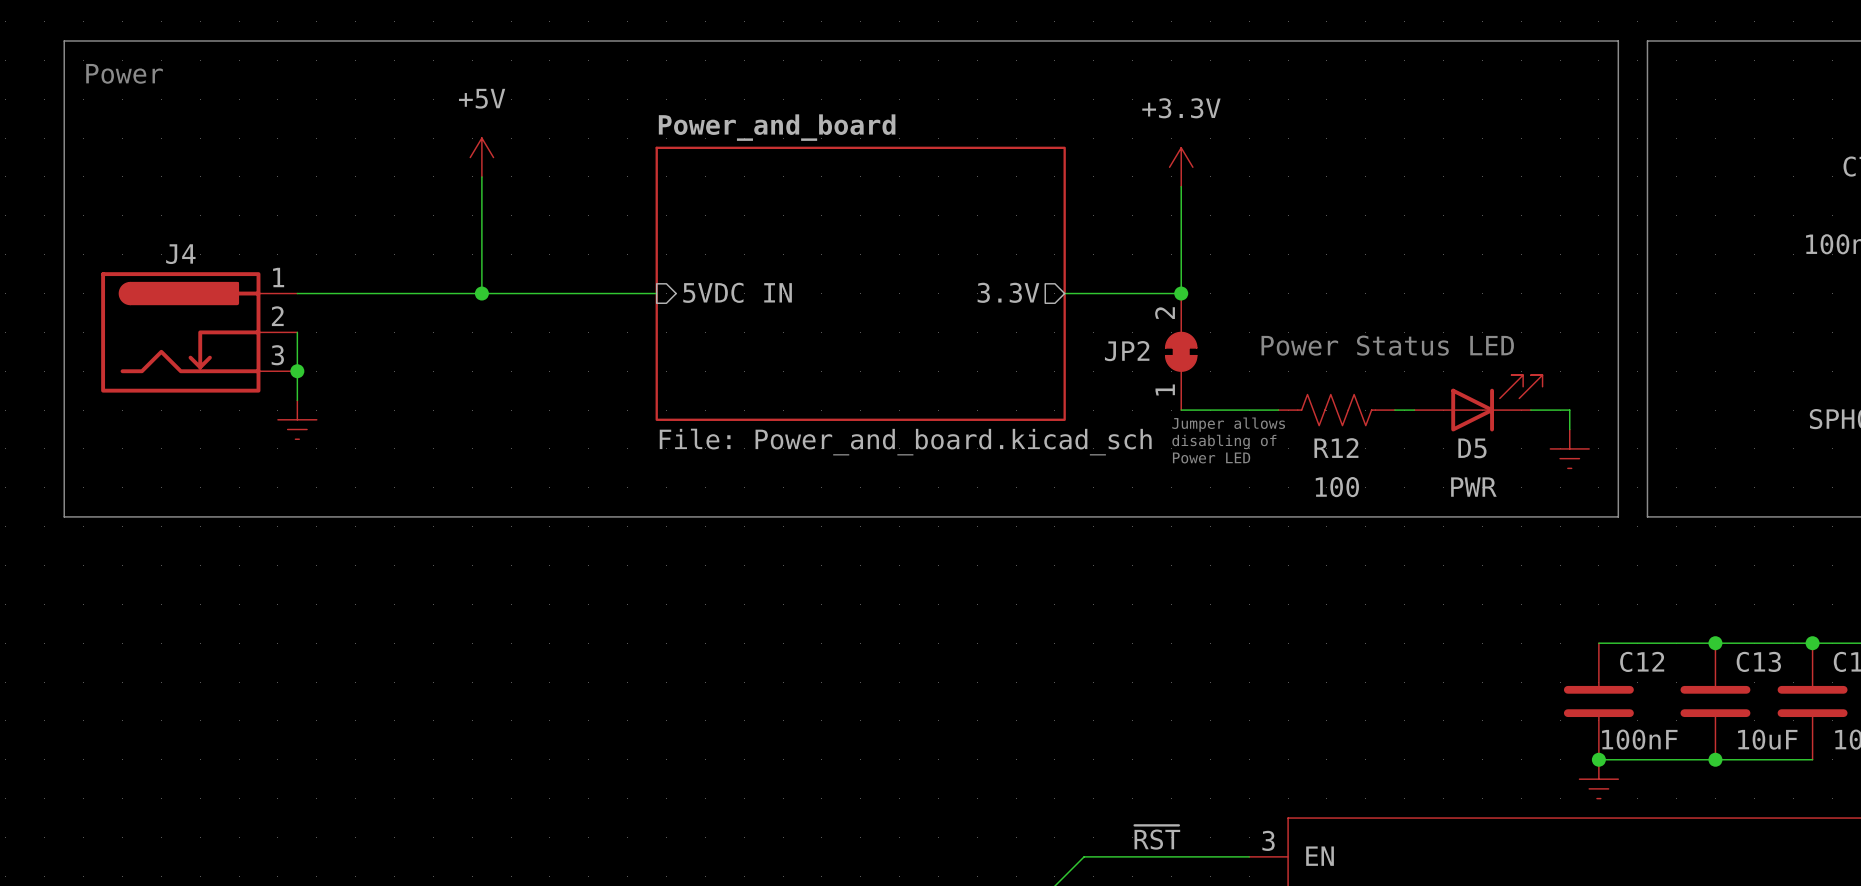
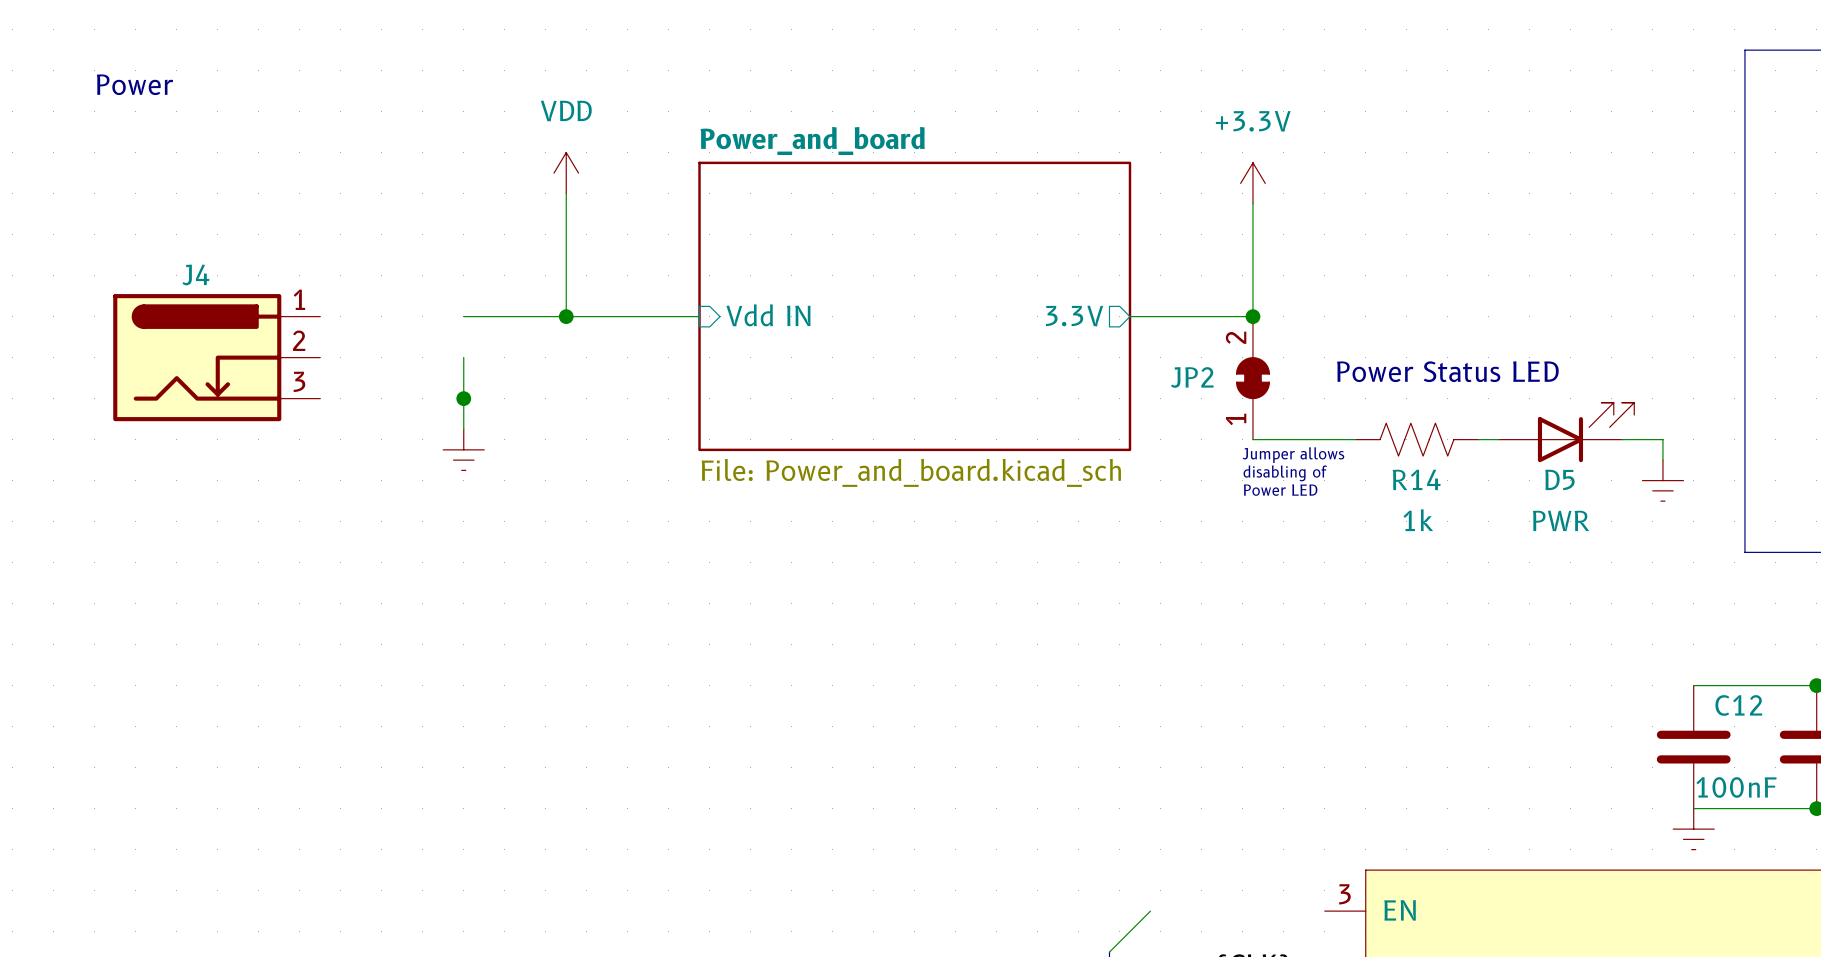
line: (64, 40) (1618, 40) (1618, 516) (64, 516) (64, 40) -> none
power symbol: +5V (481, 157) -> none
power symbol: none -> VDD (566, 173)
wire: (481, 176) (481, 293) -> (566, 193) (566, 316)
sheet pin: 5VDC IN (737, 292) -> Vdd IN (768, 315)
wire: (297, 293) (433, 293) -> none
junction: (481, 293) -> none
junction: none -> (566, 316)
wire: (297, 332) (297, 400) -> (463, 357) (463, 429)
junction: (297, 371) -> none
junction: none -> (463, 398)
power symbol position: (297, 419) -> (463, 449)
R12 name: R12 (1336, 448) -> R14 (1416, 479)
R12 value: 100 (1337, 487) -> 1k (1418, 520)
junction: (1598, 759) -> none
label: ~{RST} (1157, 837) -> none
wire: (1084, 856) (1249, 856) -> none

